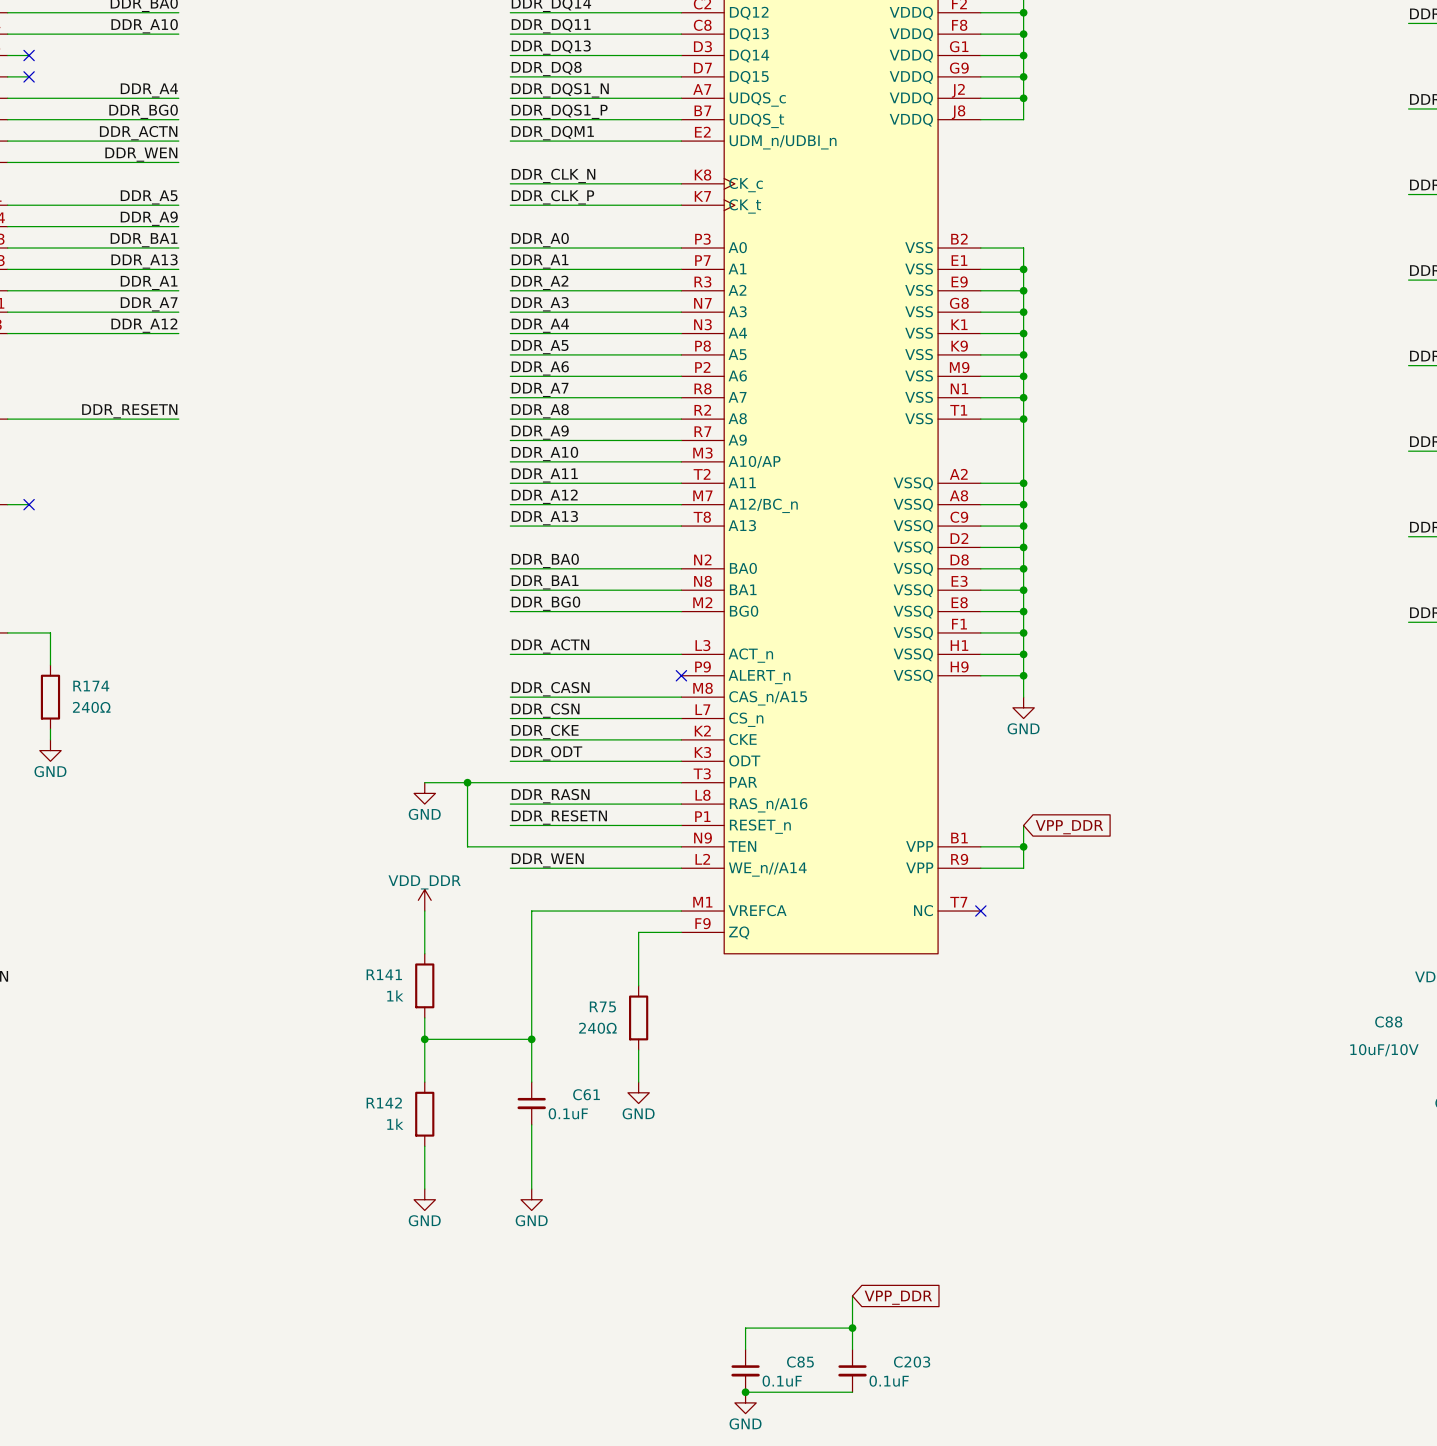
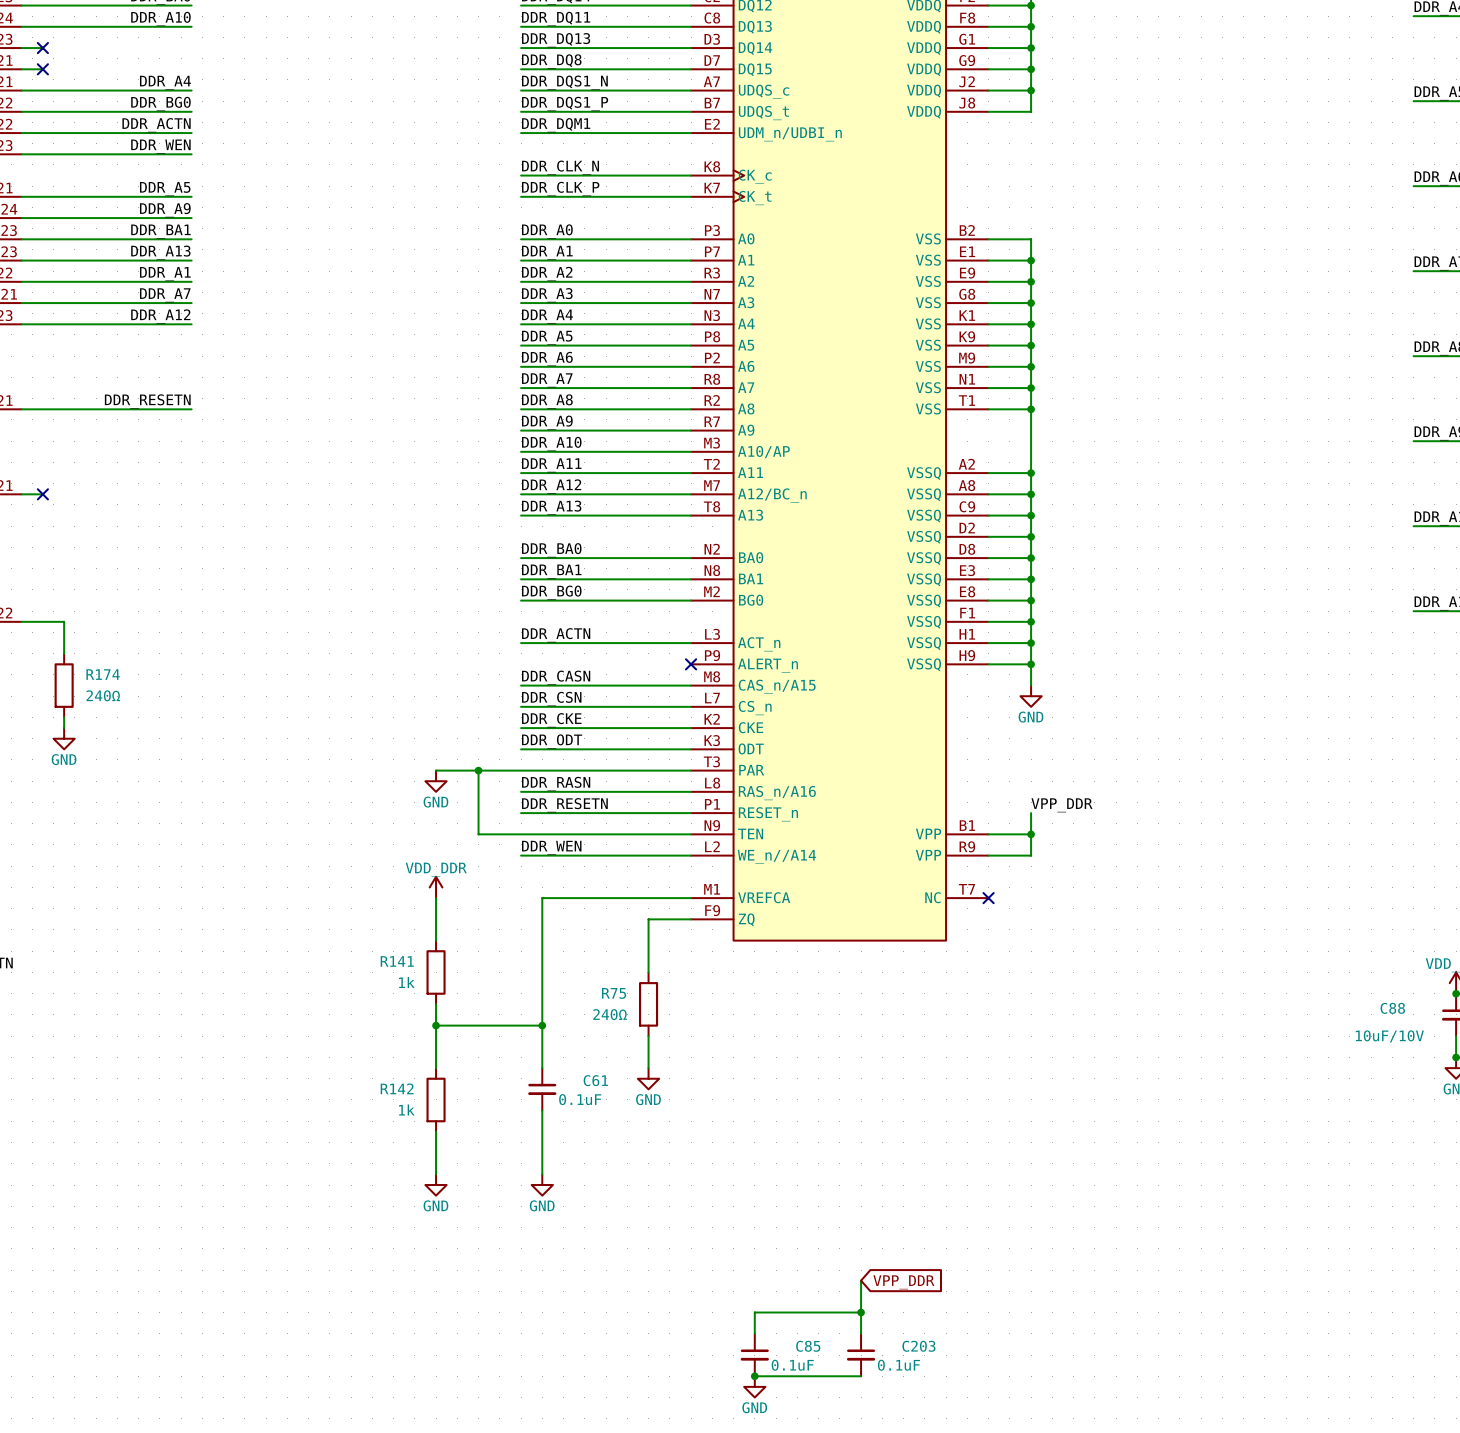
label: none -> VPP_DDR (1061, 805)
global label: VPP_DDR (1069, 827) -> none

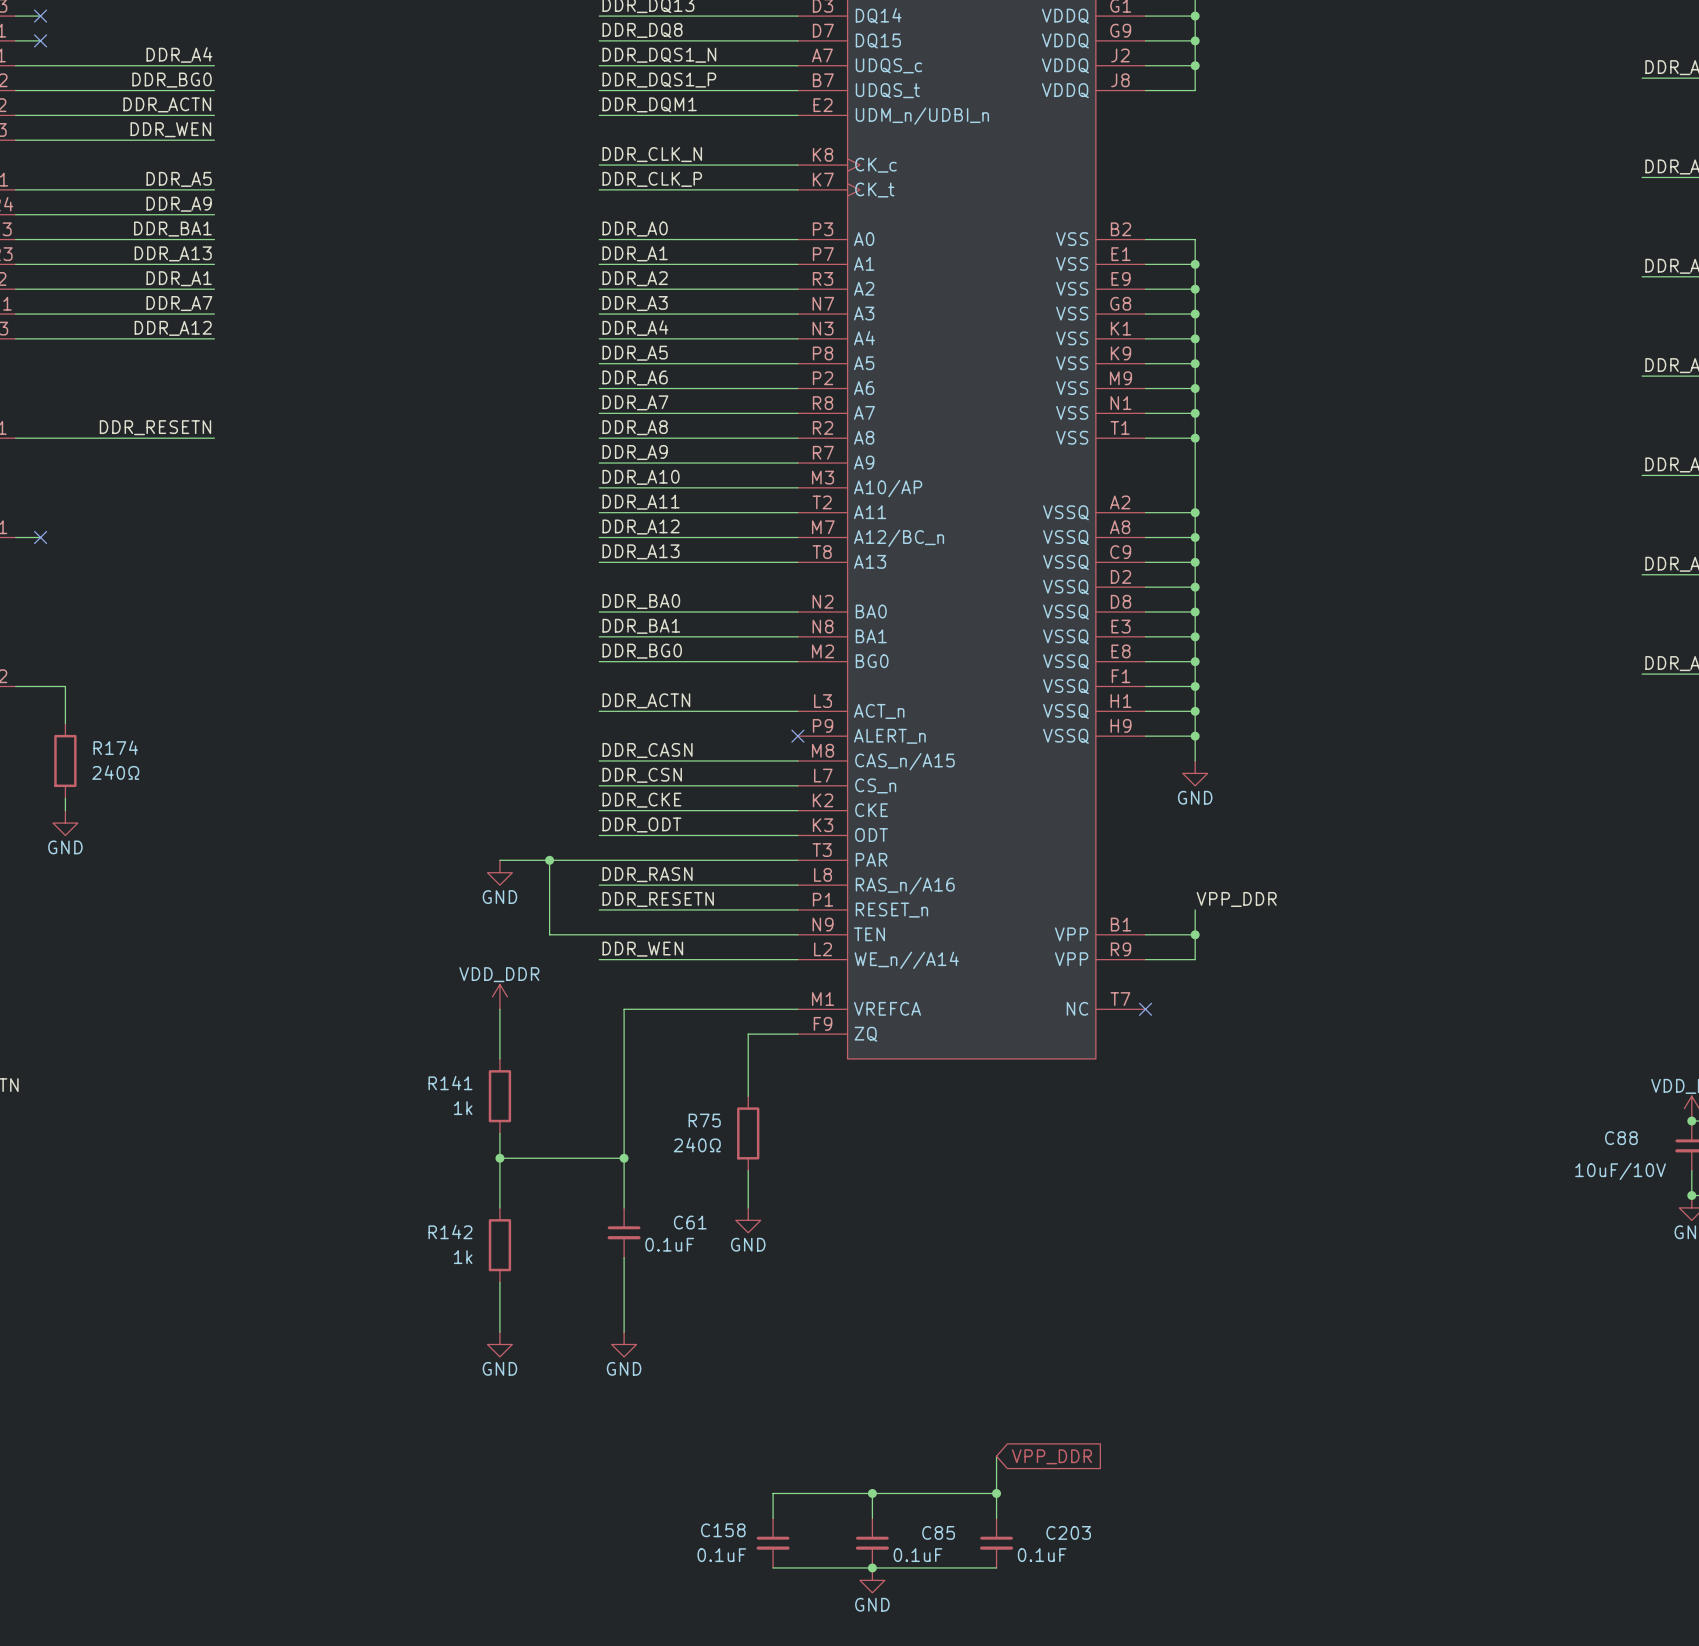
wire: none -> (872, 1493) (773, 1493) (773, 1518)
junction: none -> (872, 1493)
C158: none -> (773, 1543)
wire: none -> (773, 1567) (872, 1567)

